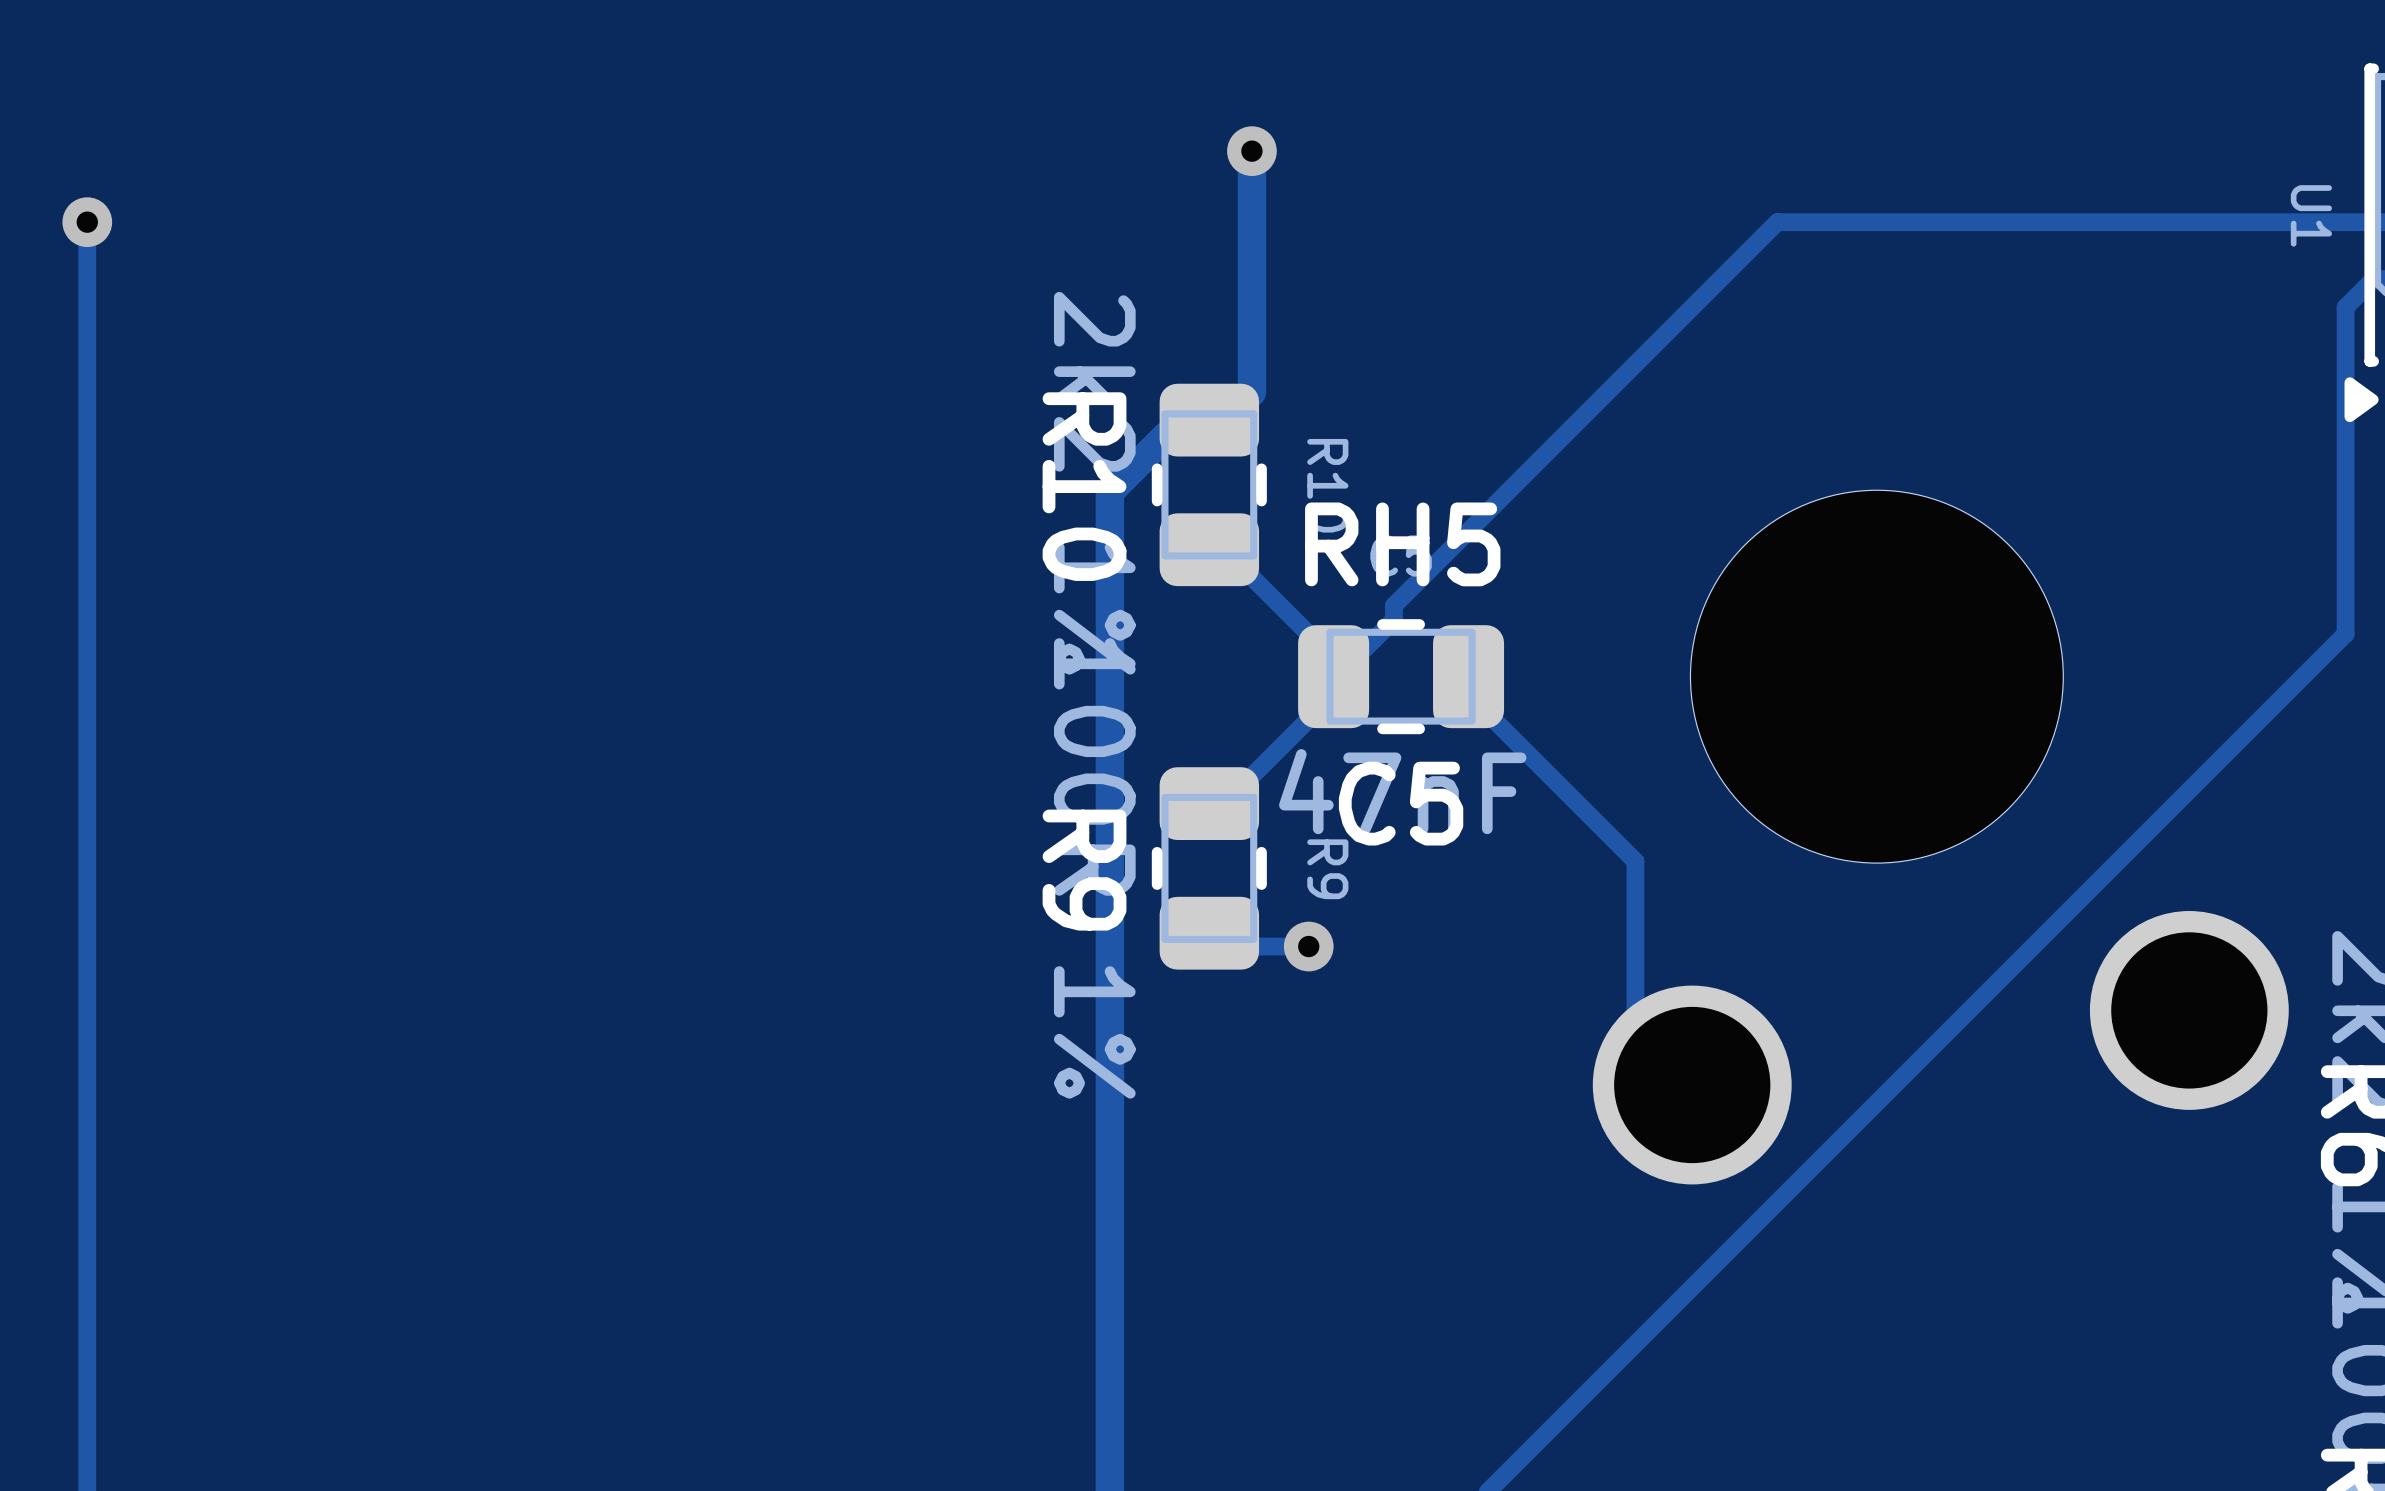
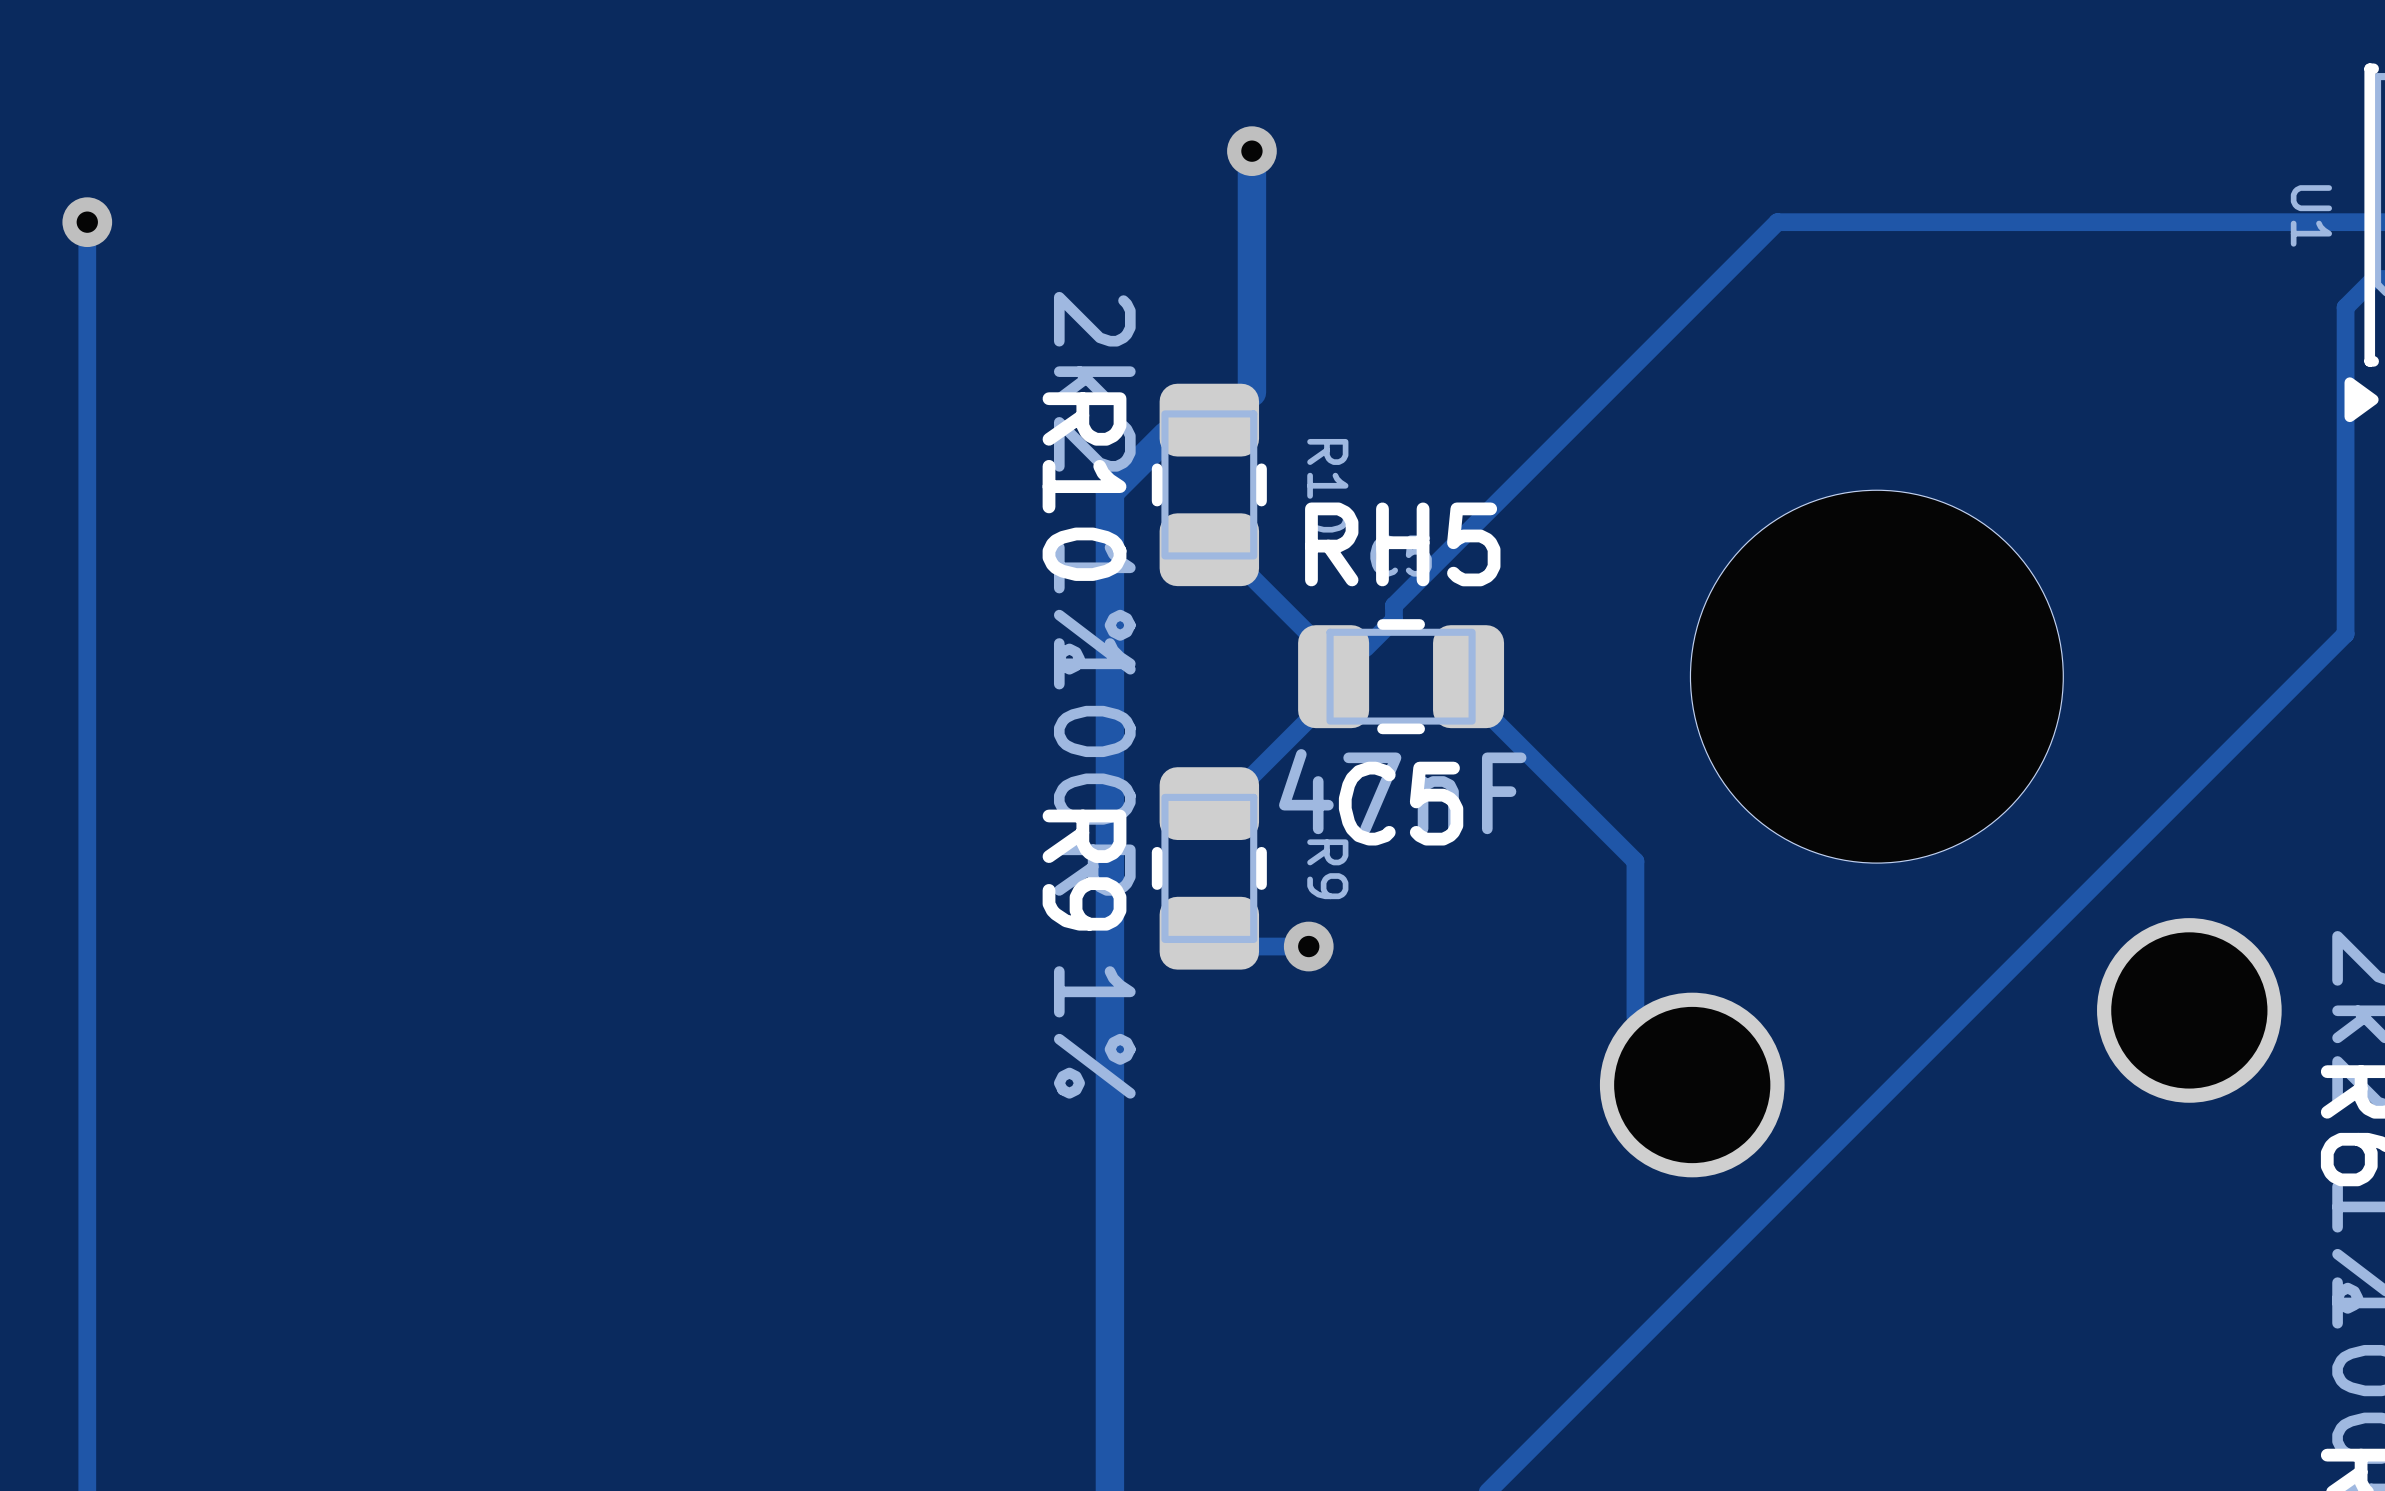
part footprint: [1592, 490, 2289, 1185] -> [1599, 490, 2282, 1178]

